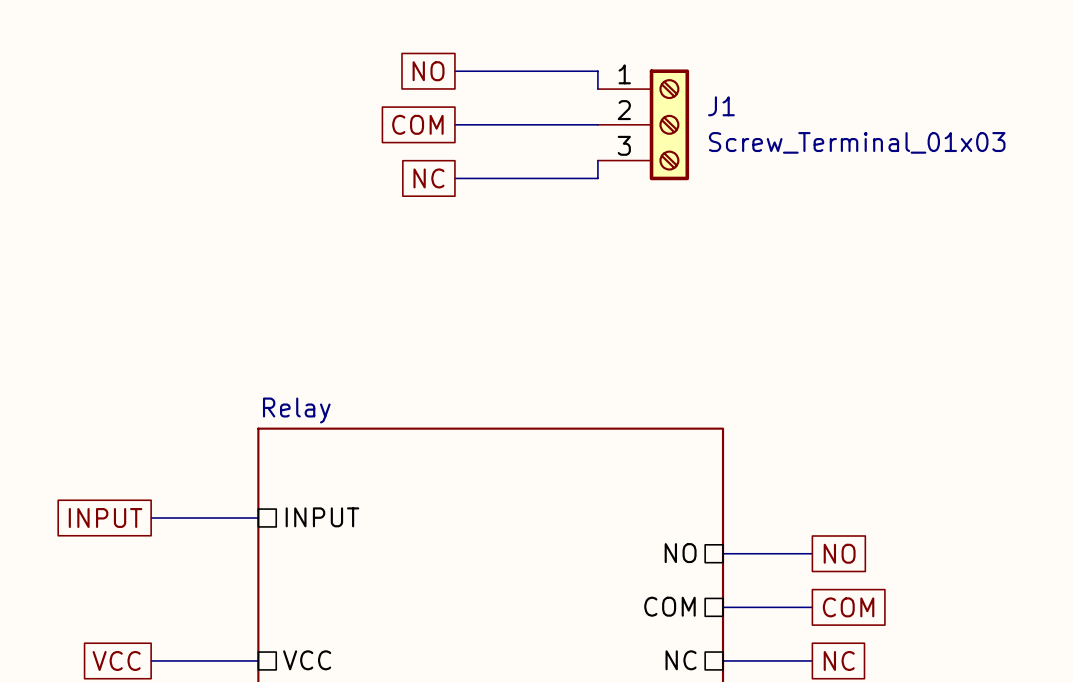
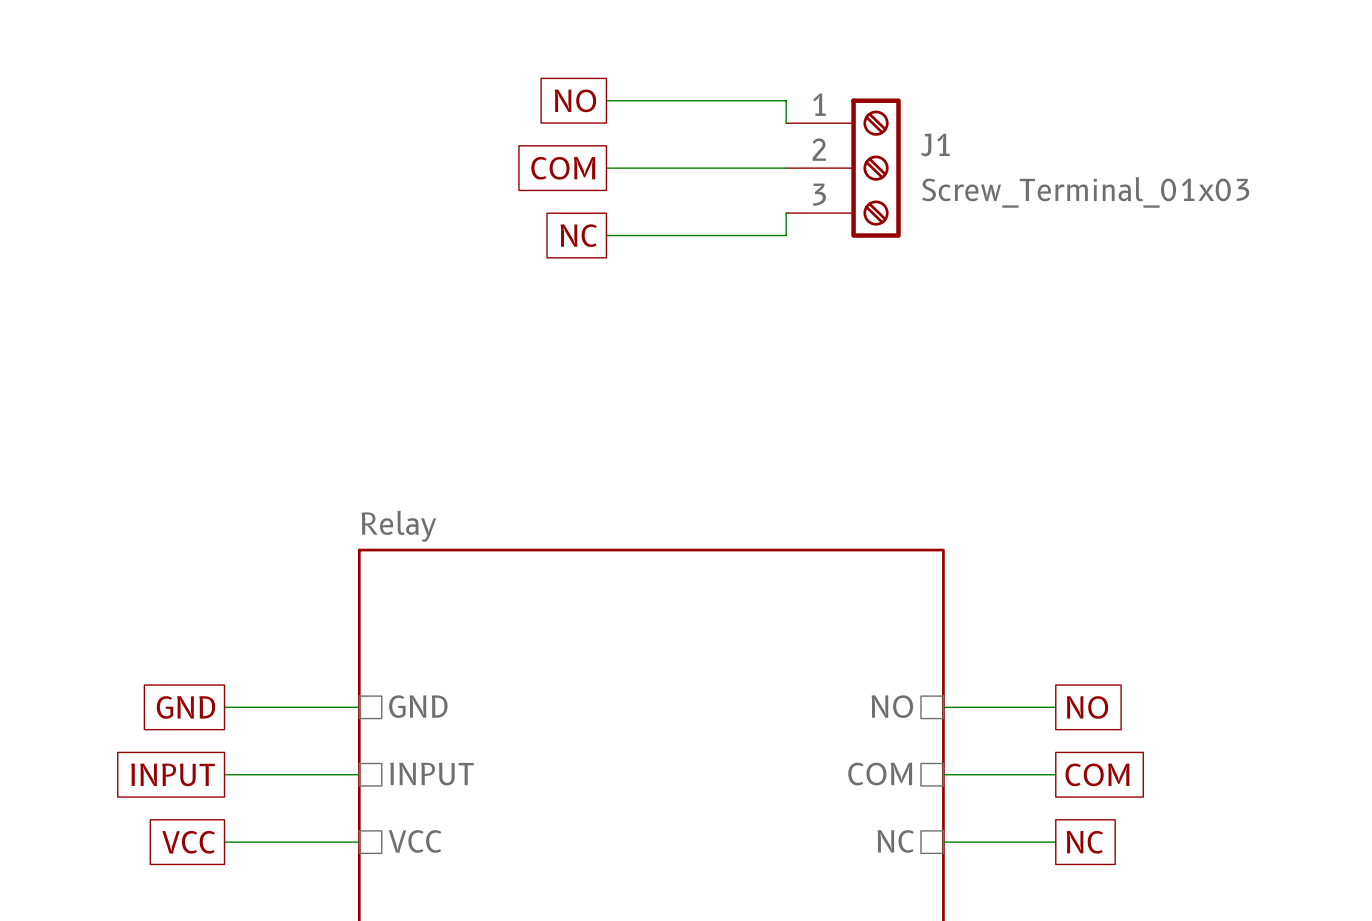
sheet pin position: INPUT (322, 517) -> INPUT (431, 774)
global label position: INPUT (105, 518) -> INPUT (173, 774)
wire: (151, 518) (258, 518) -> (224, 707) (359, 707)
global label: none -> GND (185, 707)
sheet pin: none -> GND (418, 706)
wire: none -> (224, 774) (359, 774)

